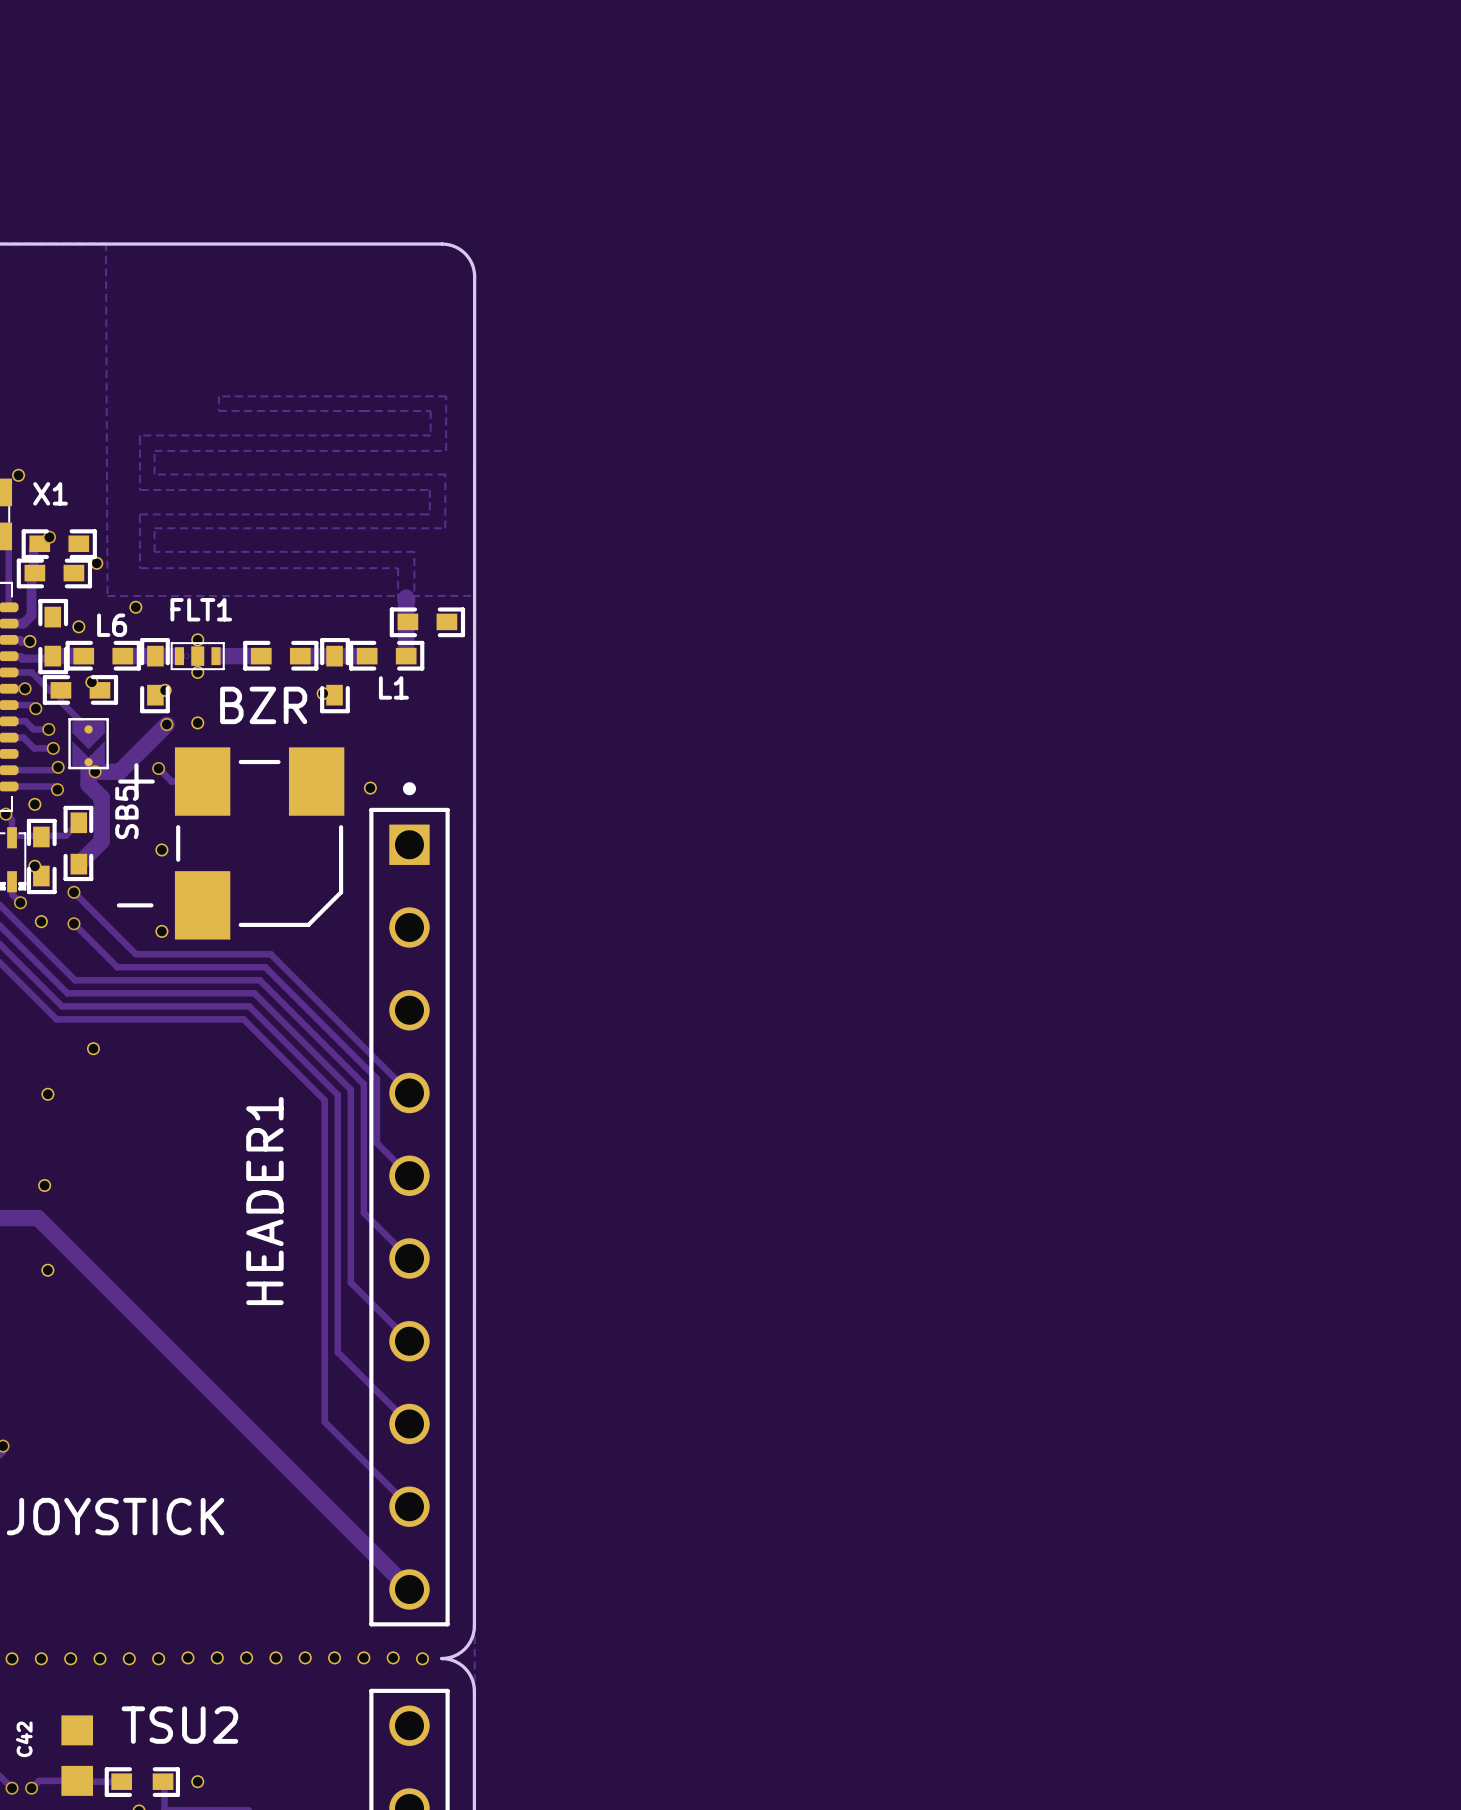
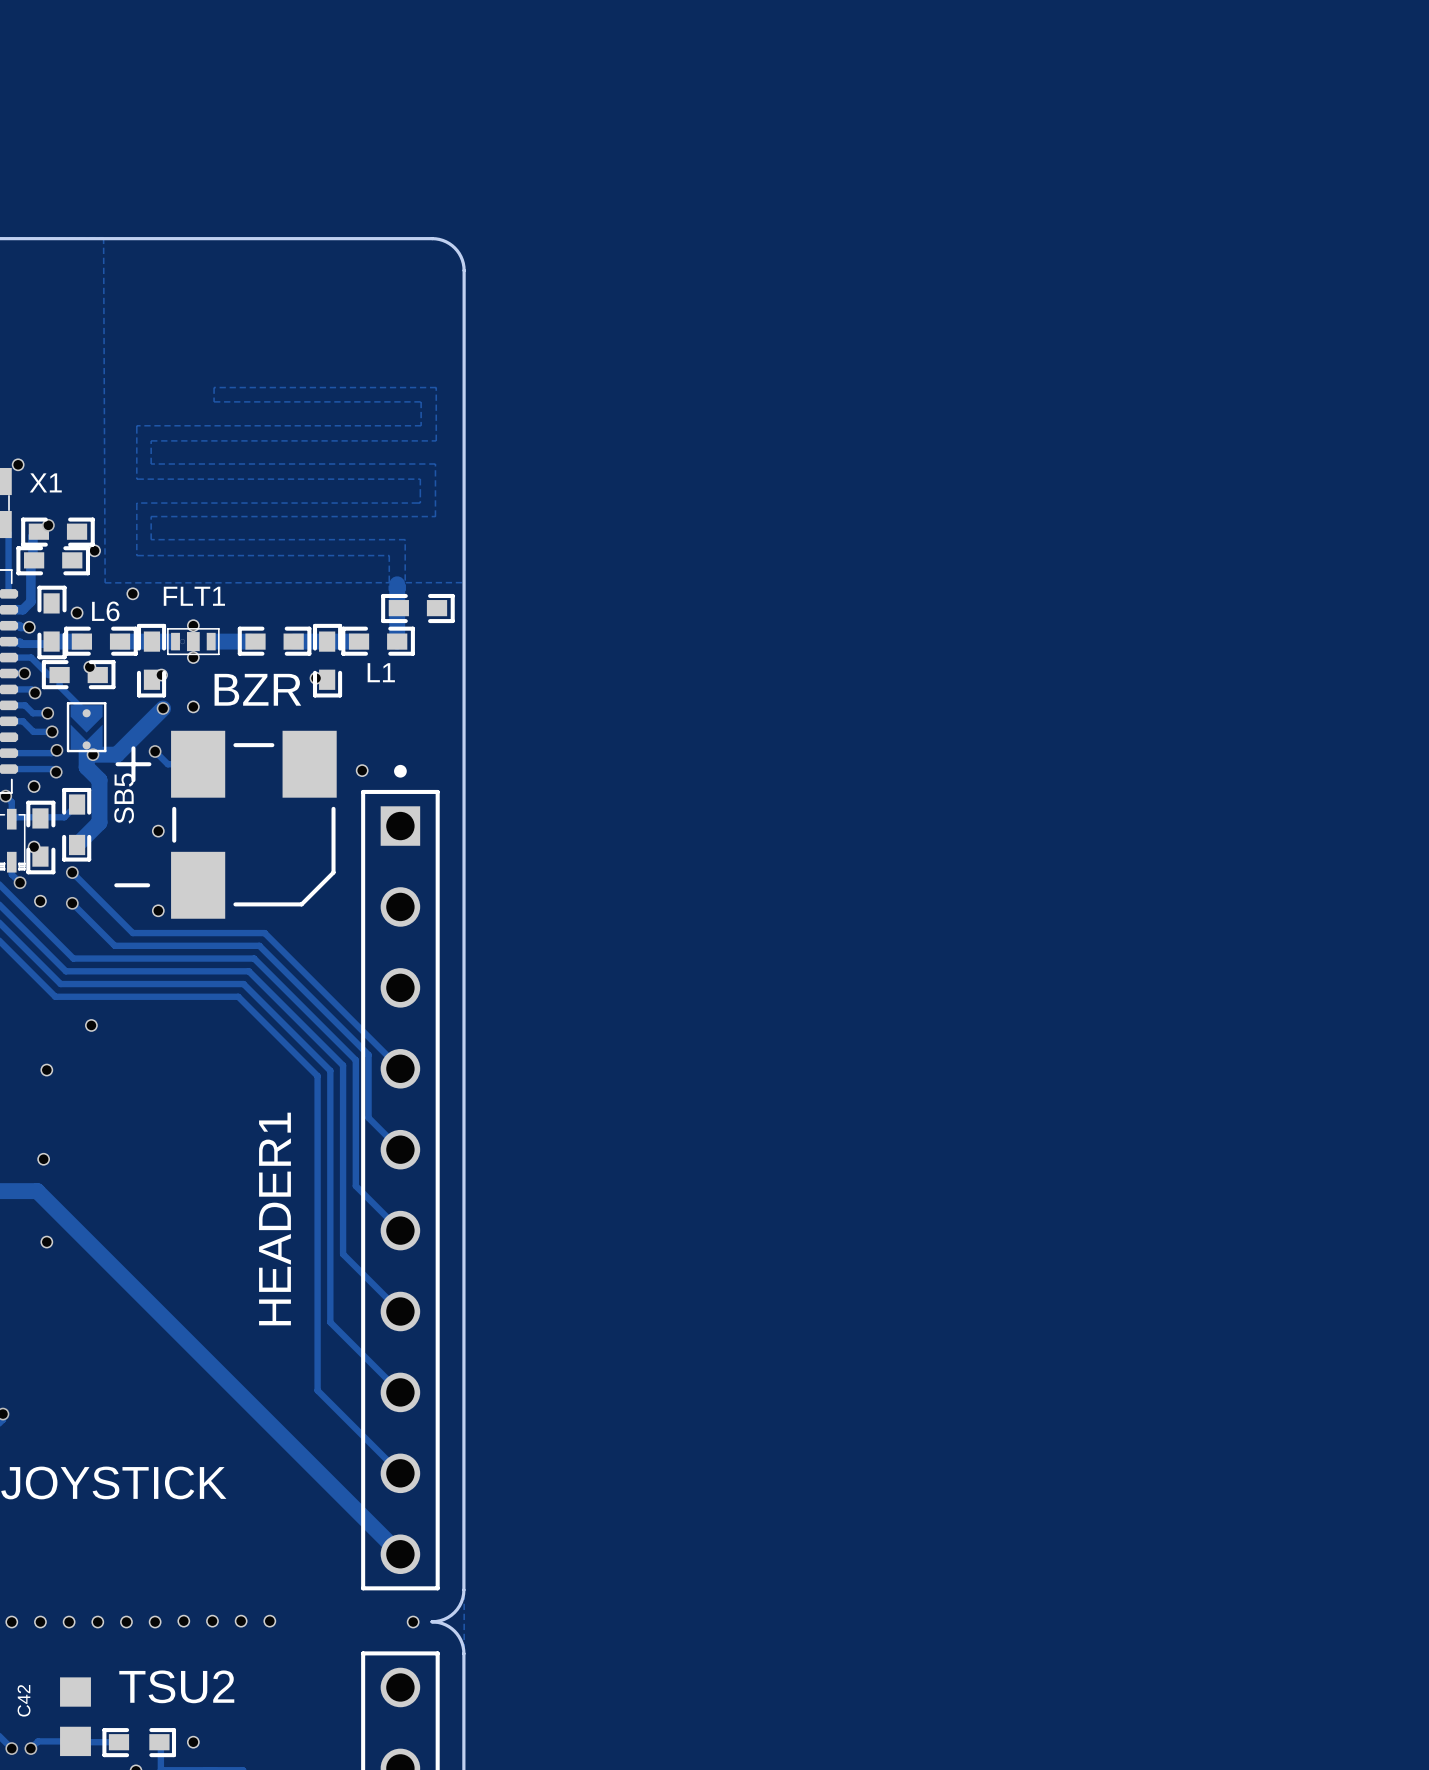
HEADER1 name position: HEADER1 (264, 1201) -> HEADER1 (274, 1219)
part: (305, 1657) -> none
part: (334, 1657) -> none
part: (363, 1657) -> none
part: (393, 1657) -> none

